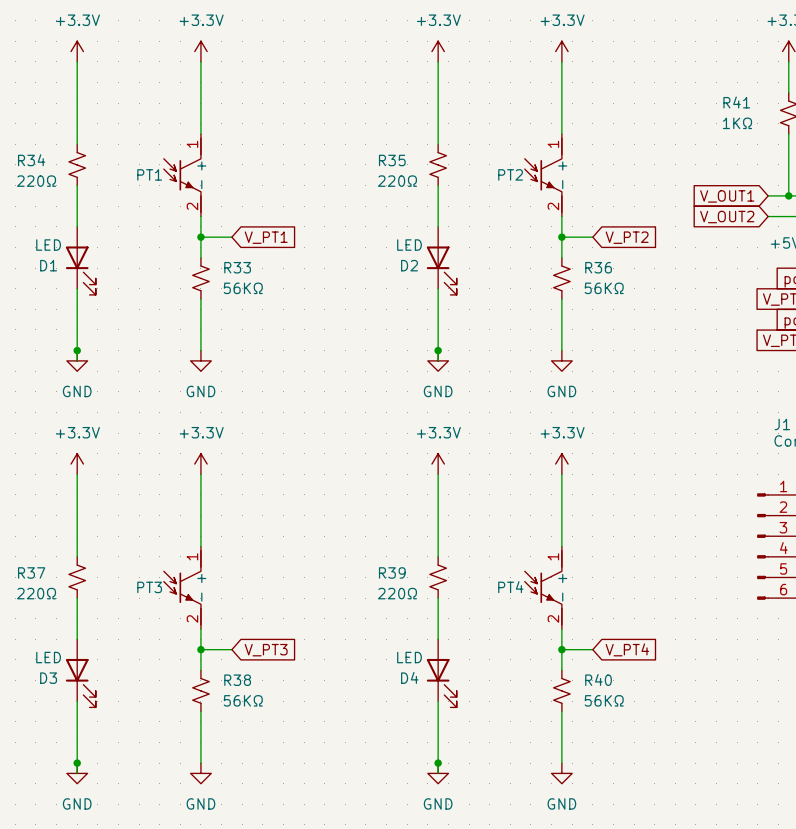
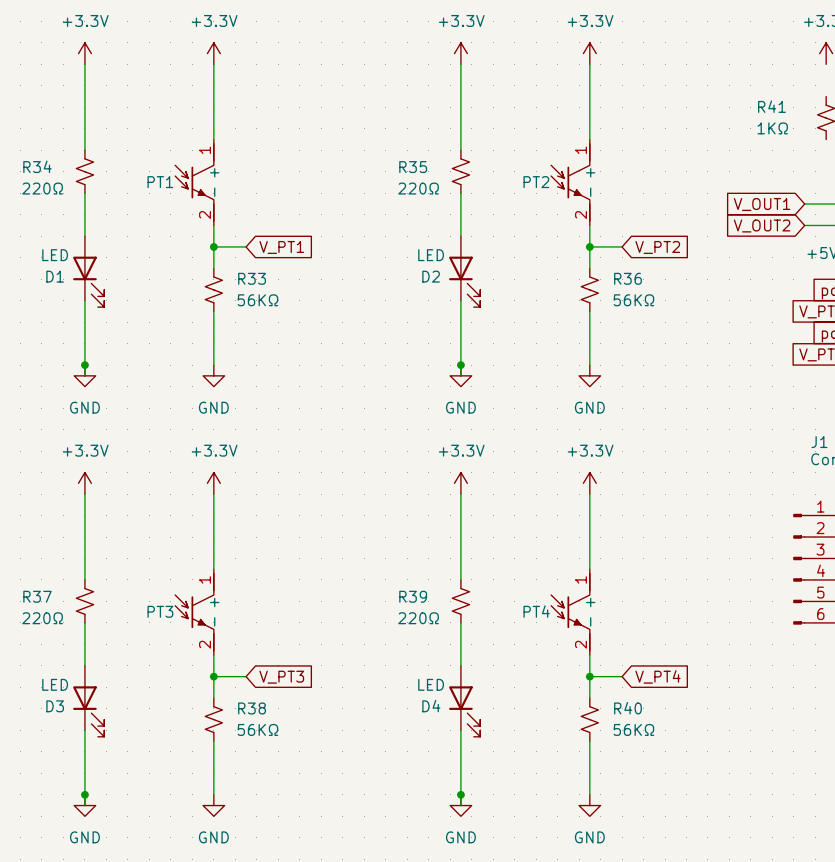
wire: (788, 61) (788, 92) -> none
wire: (788, 134) (788, 195) -> none
junction: (788, 195) -> none

